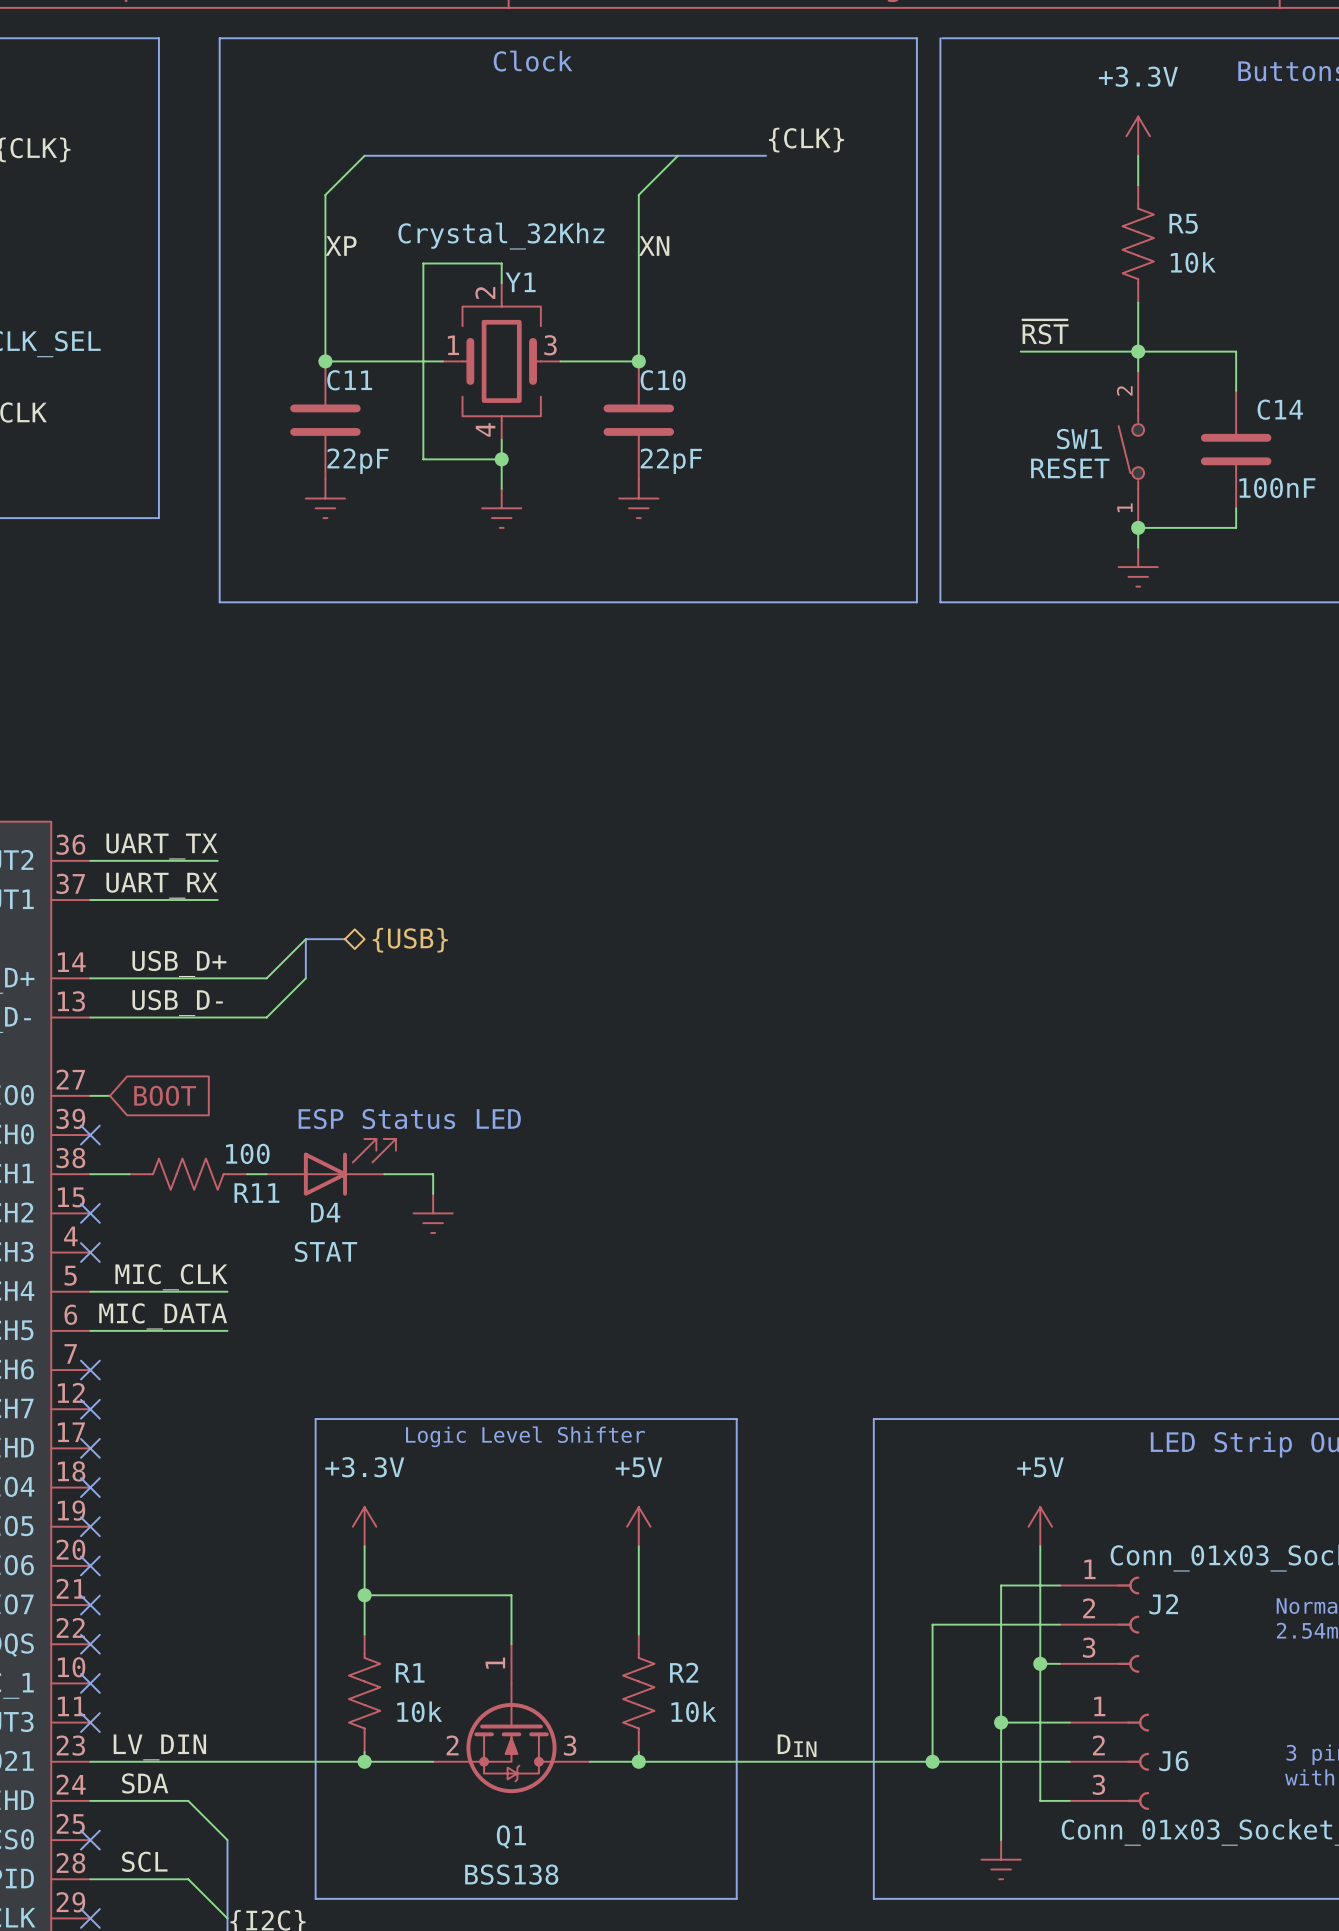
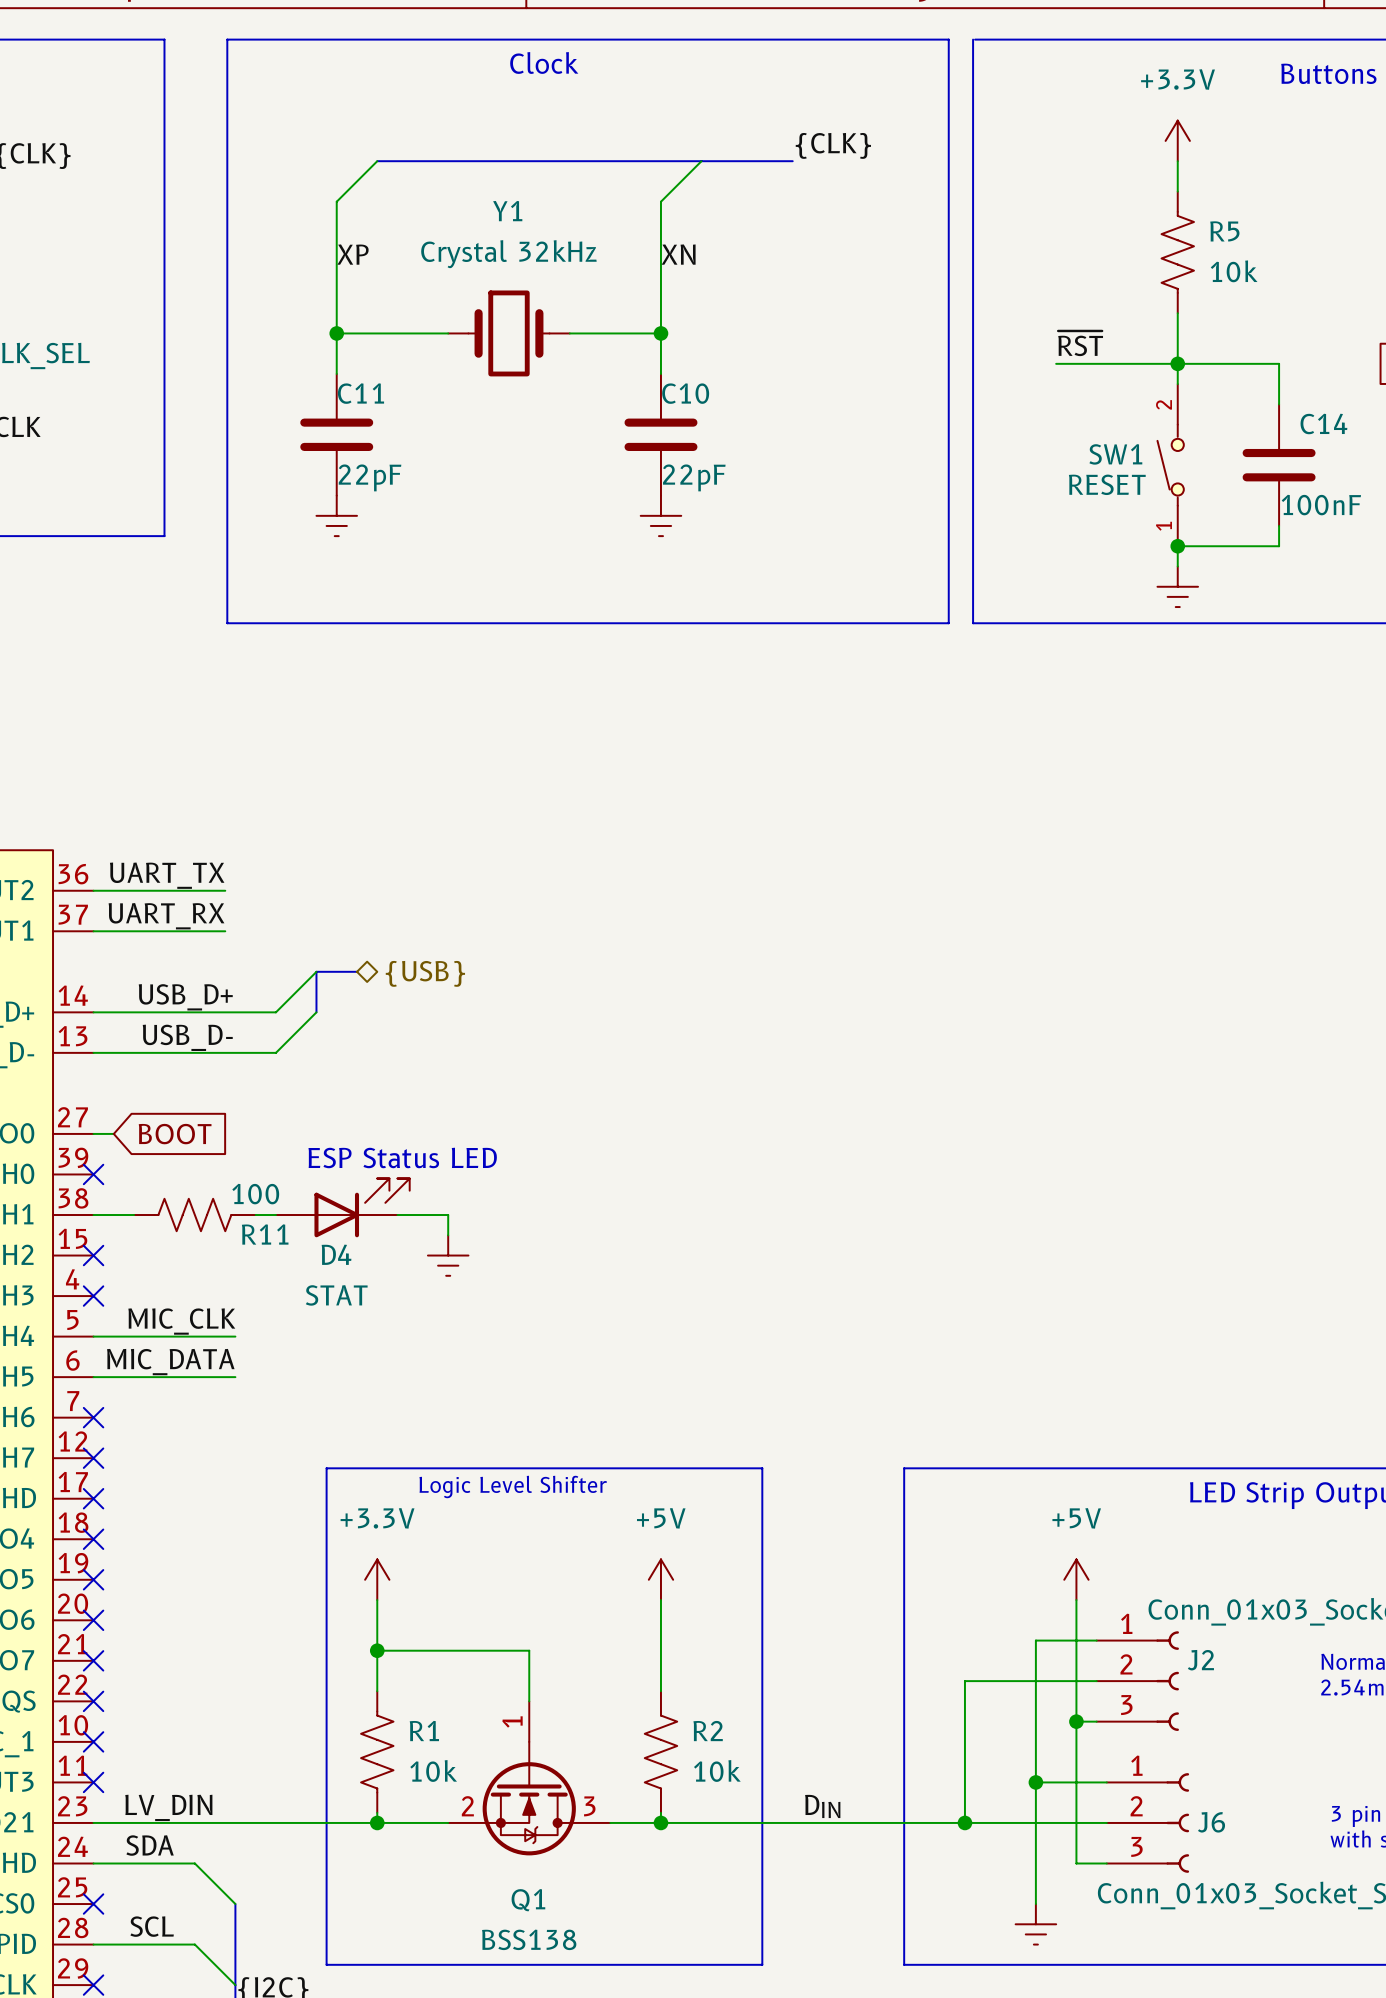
Y1 value: Crystal_32Khz (501, 236) -> Crystal 32kHz (508, 254)
Y1 name position: Y1 (520, 282) -> Y1 (507, 211)
Y1 symbol: [442, 283, 561, 440] -> [448, 290, 570, 377]
wire: (501, 283) (501, 263) (423, 263) (423, 459) (501, 459) -> none
wire: none -> (336, 333) (448, 333)
wire: none -> (569, 333) (660, 333)
wire: (325, 361) (442, 361) -> none
junction position: (325, 361) -> (336, 333)
wire: (560, 361) (638, 361) -> none
junction position: (638, 361) -> (660, 333)
wire: (501, 439) (501, 488) -> none
junction: (501, 459) -> none
power symbol: (501, 508) -> none

